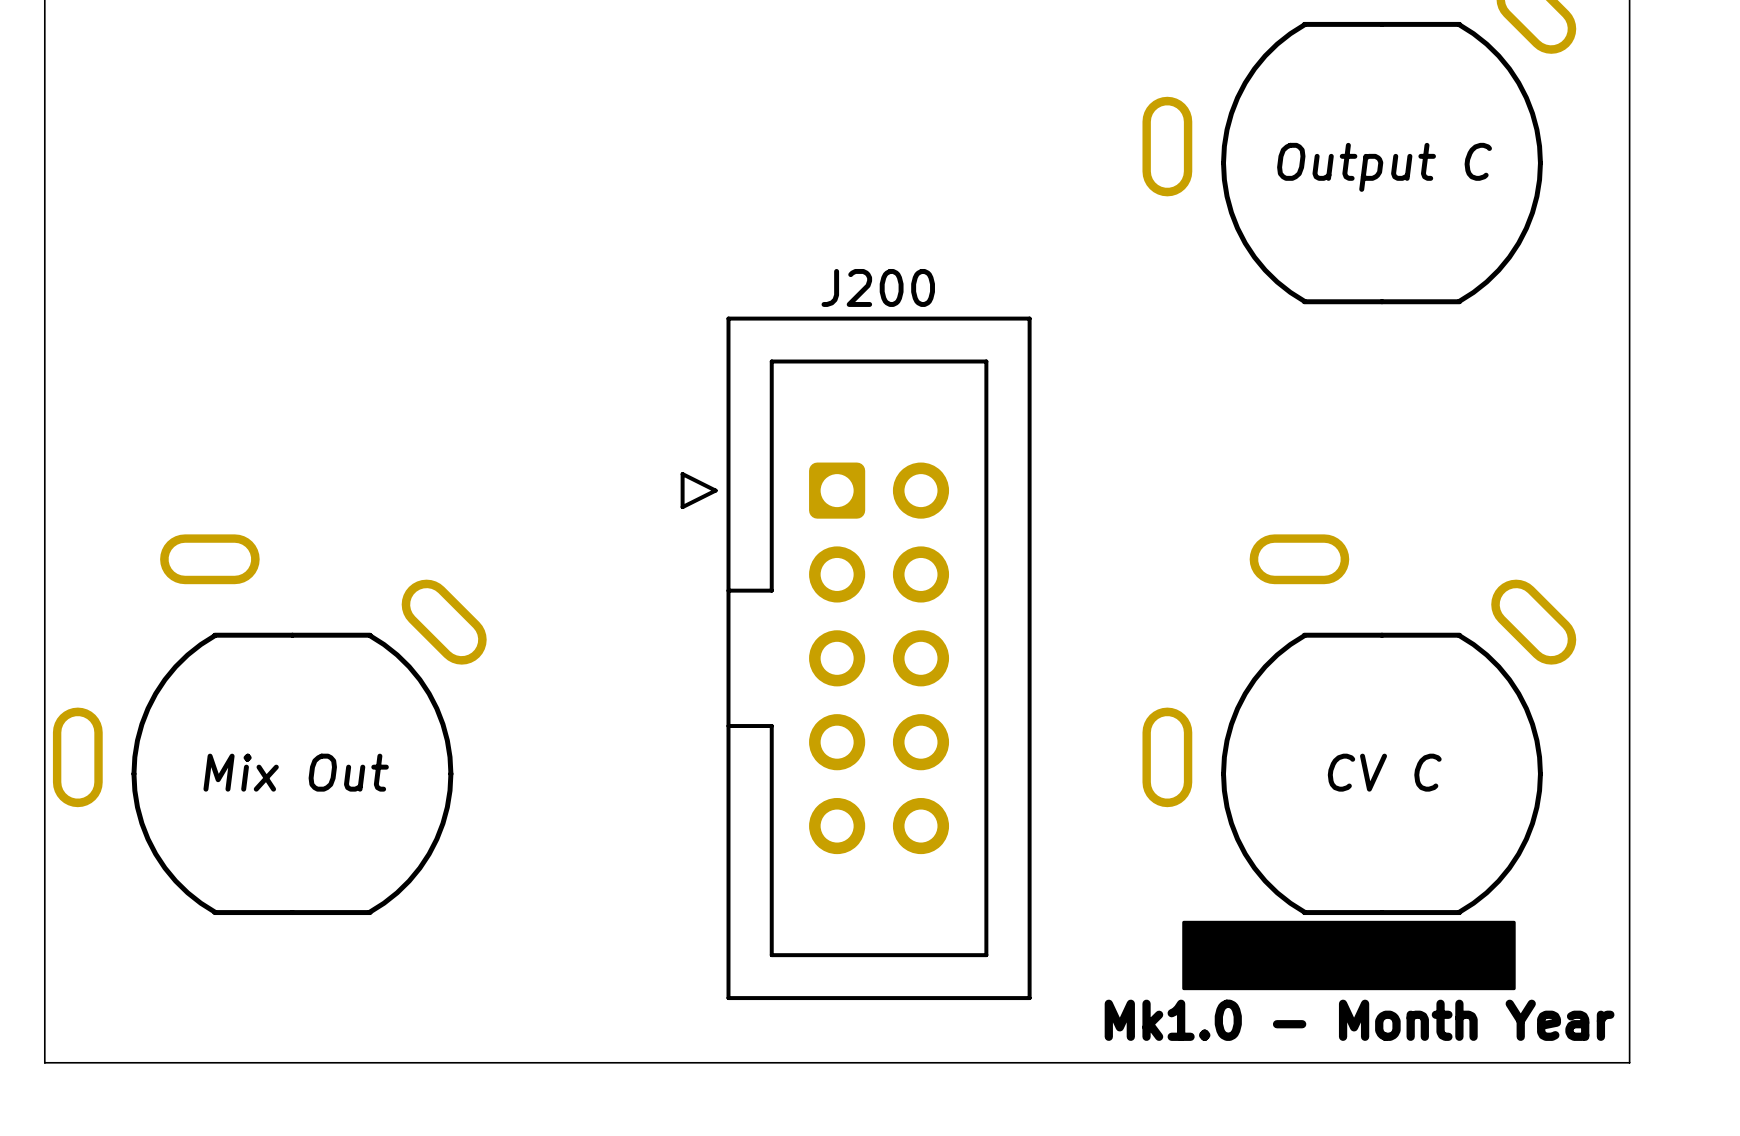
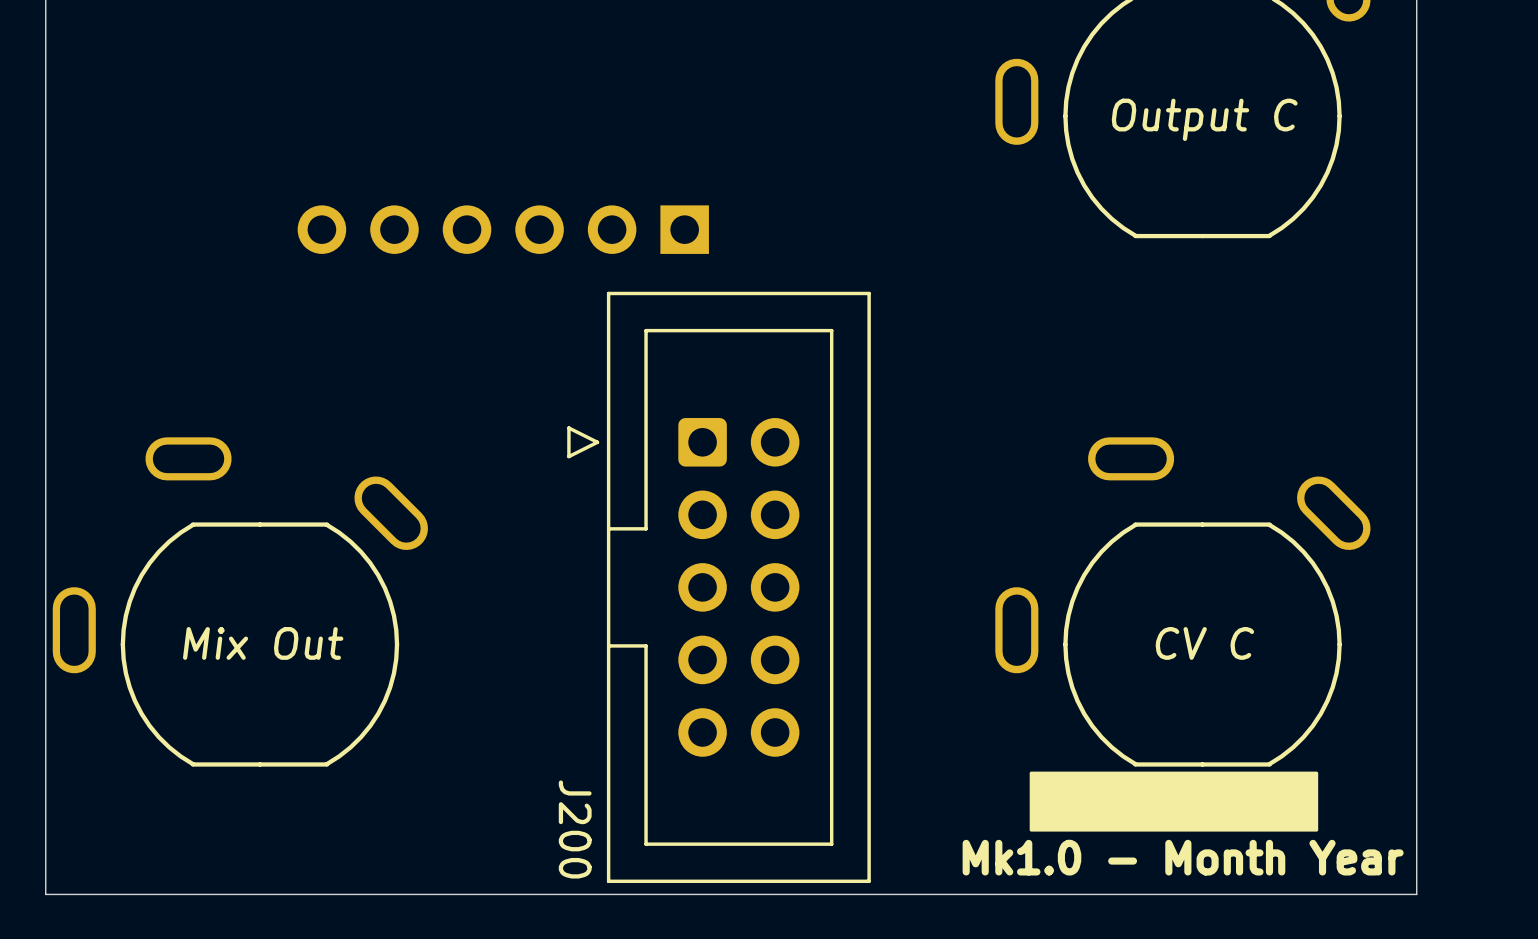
J200 name rotation: 0° (878, 287) -> 90° clockwise (575, 829)
J200 name position: J200 (878, 287) -> J200 (575, 829)
part: none -> (503, 229)
J200 position: (856, 658) -> (719, 587)

